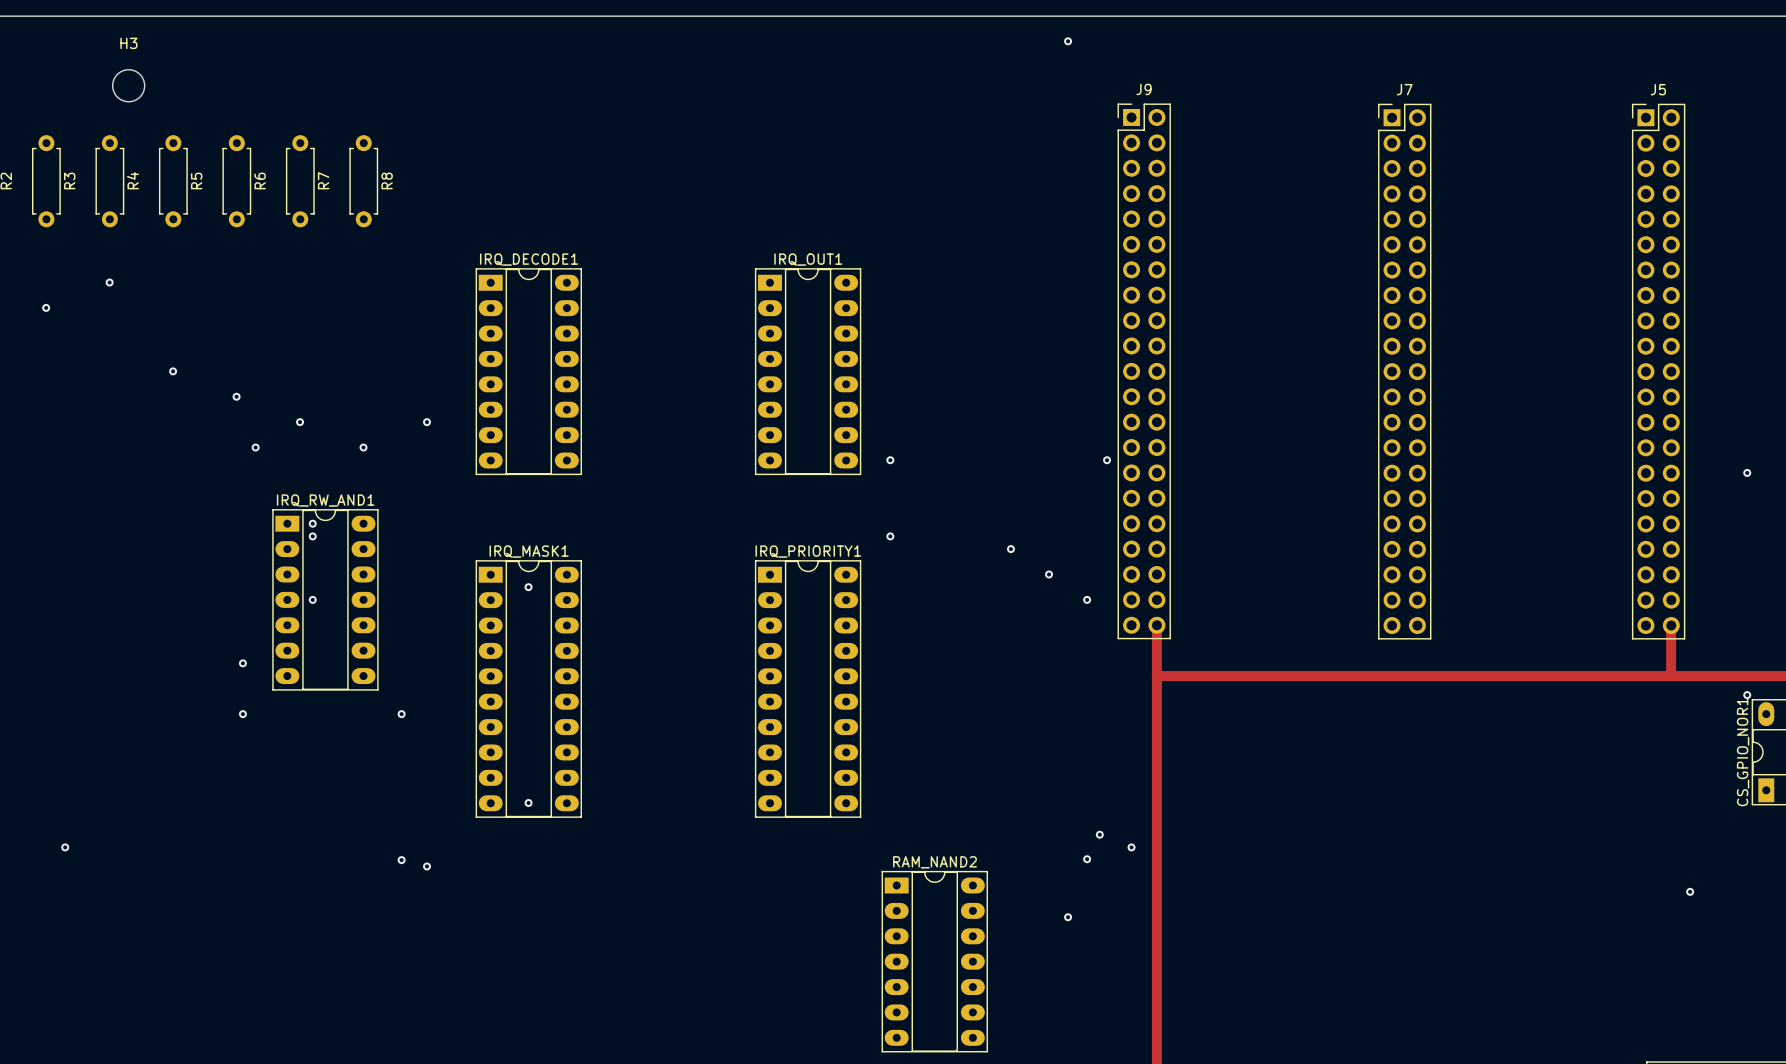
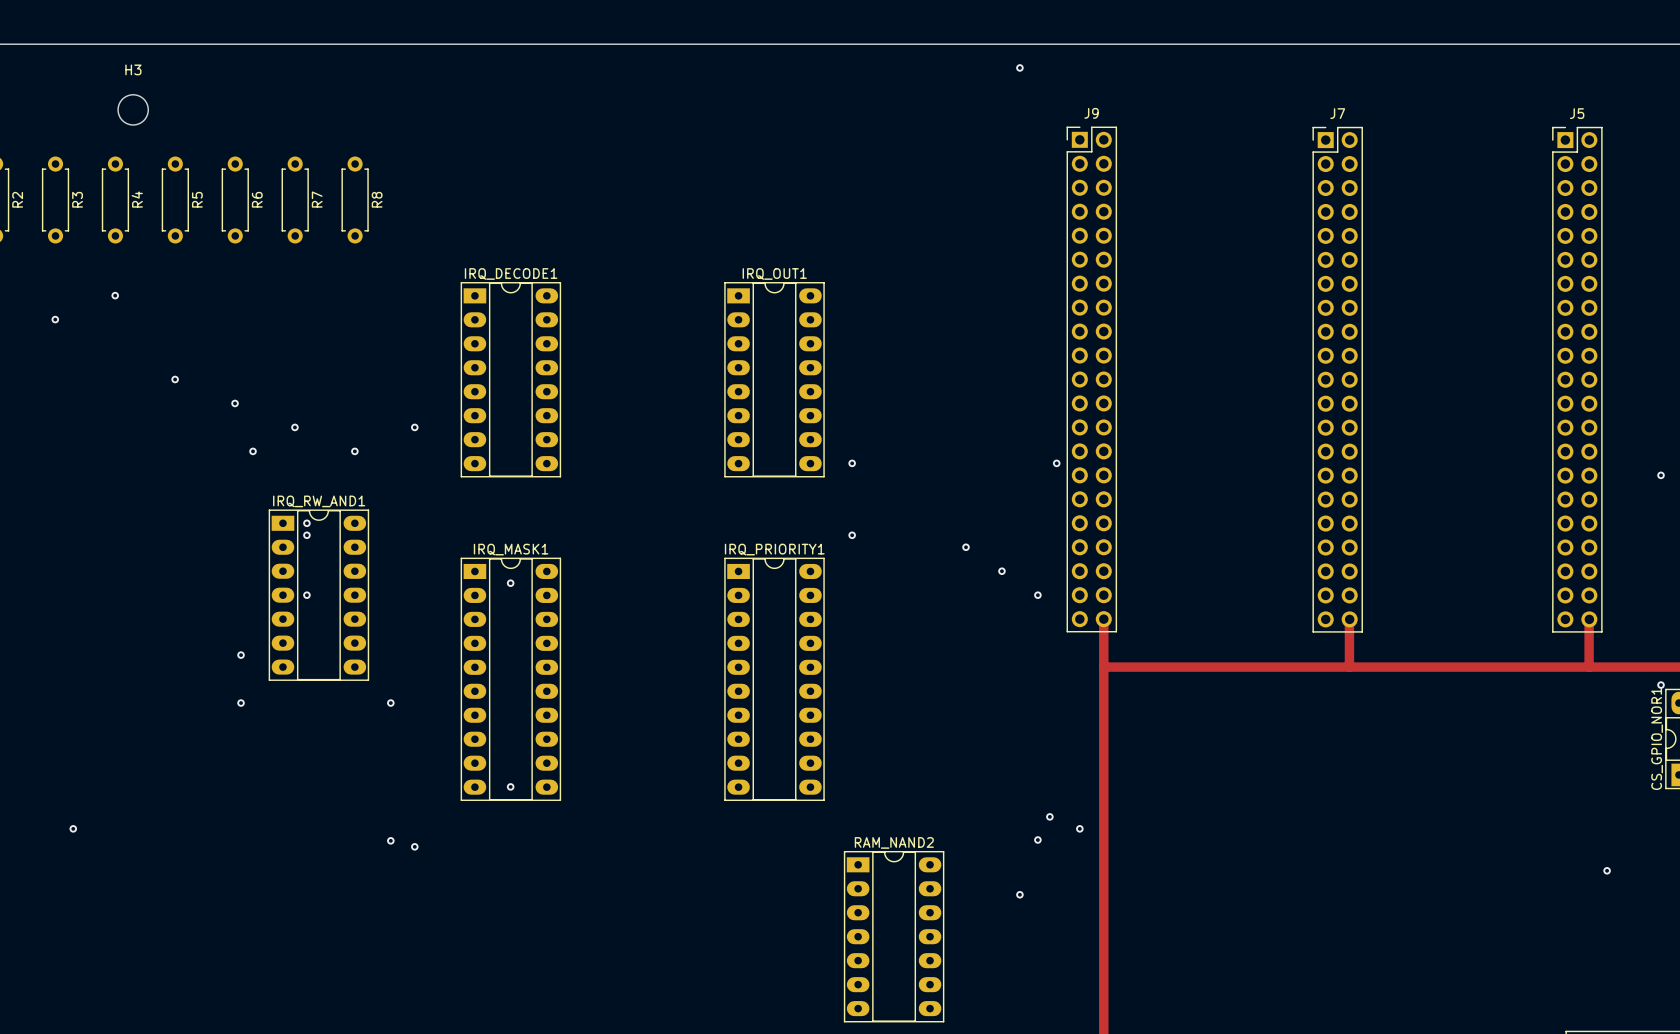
track: none -> (1349, 619) (1349, 667)

